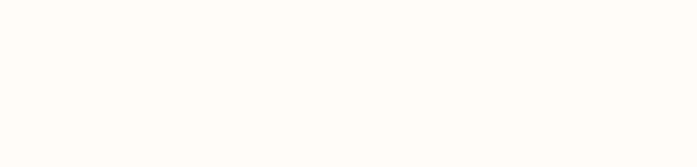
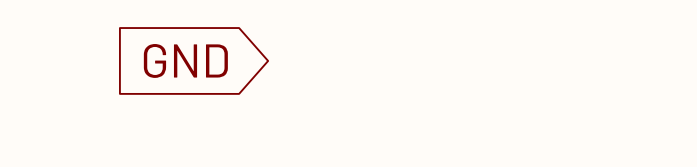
global label: none -> GND (185, 60)

